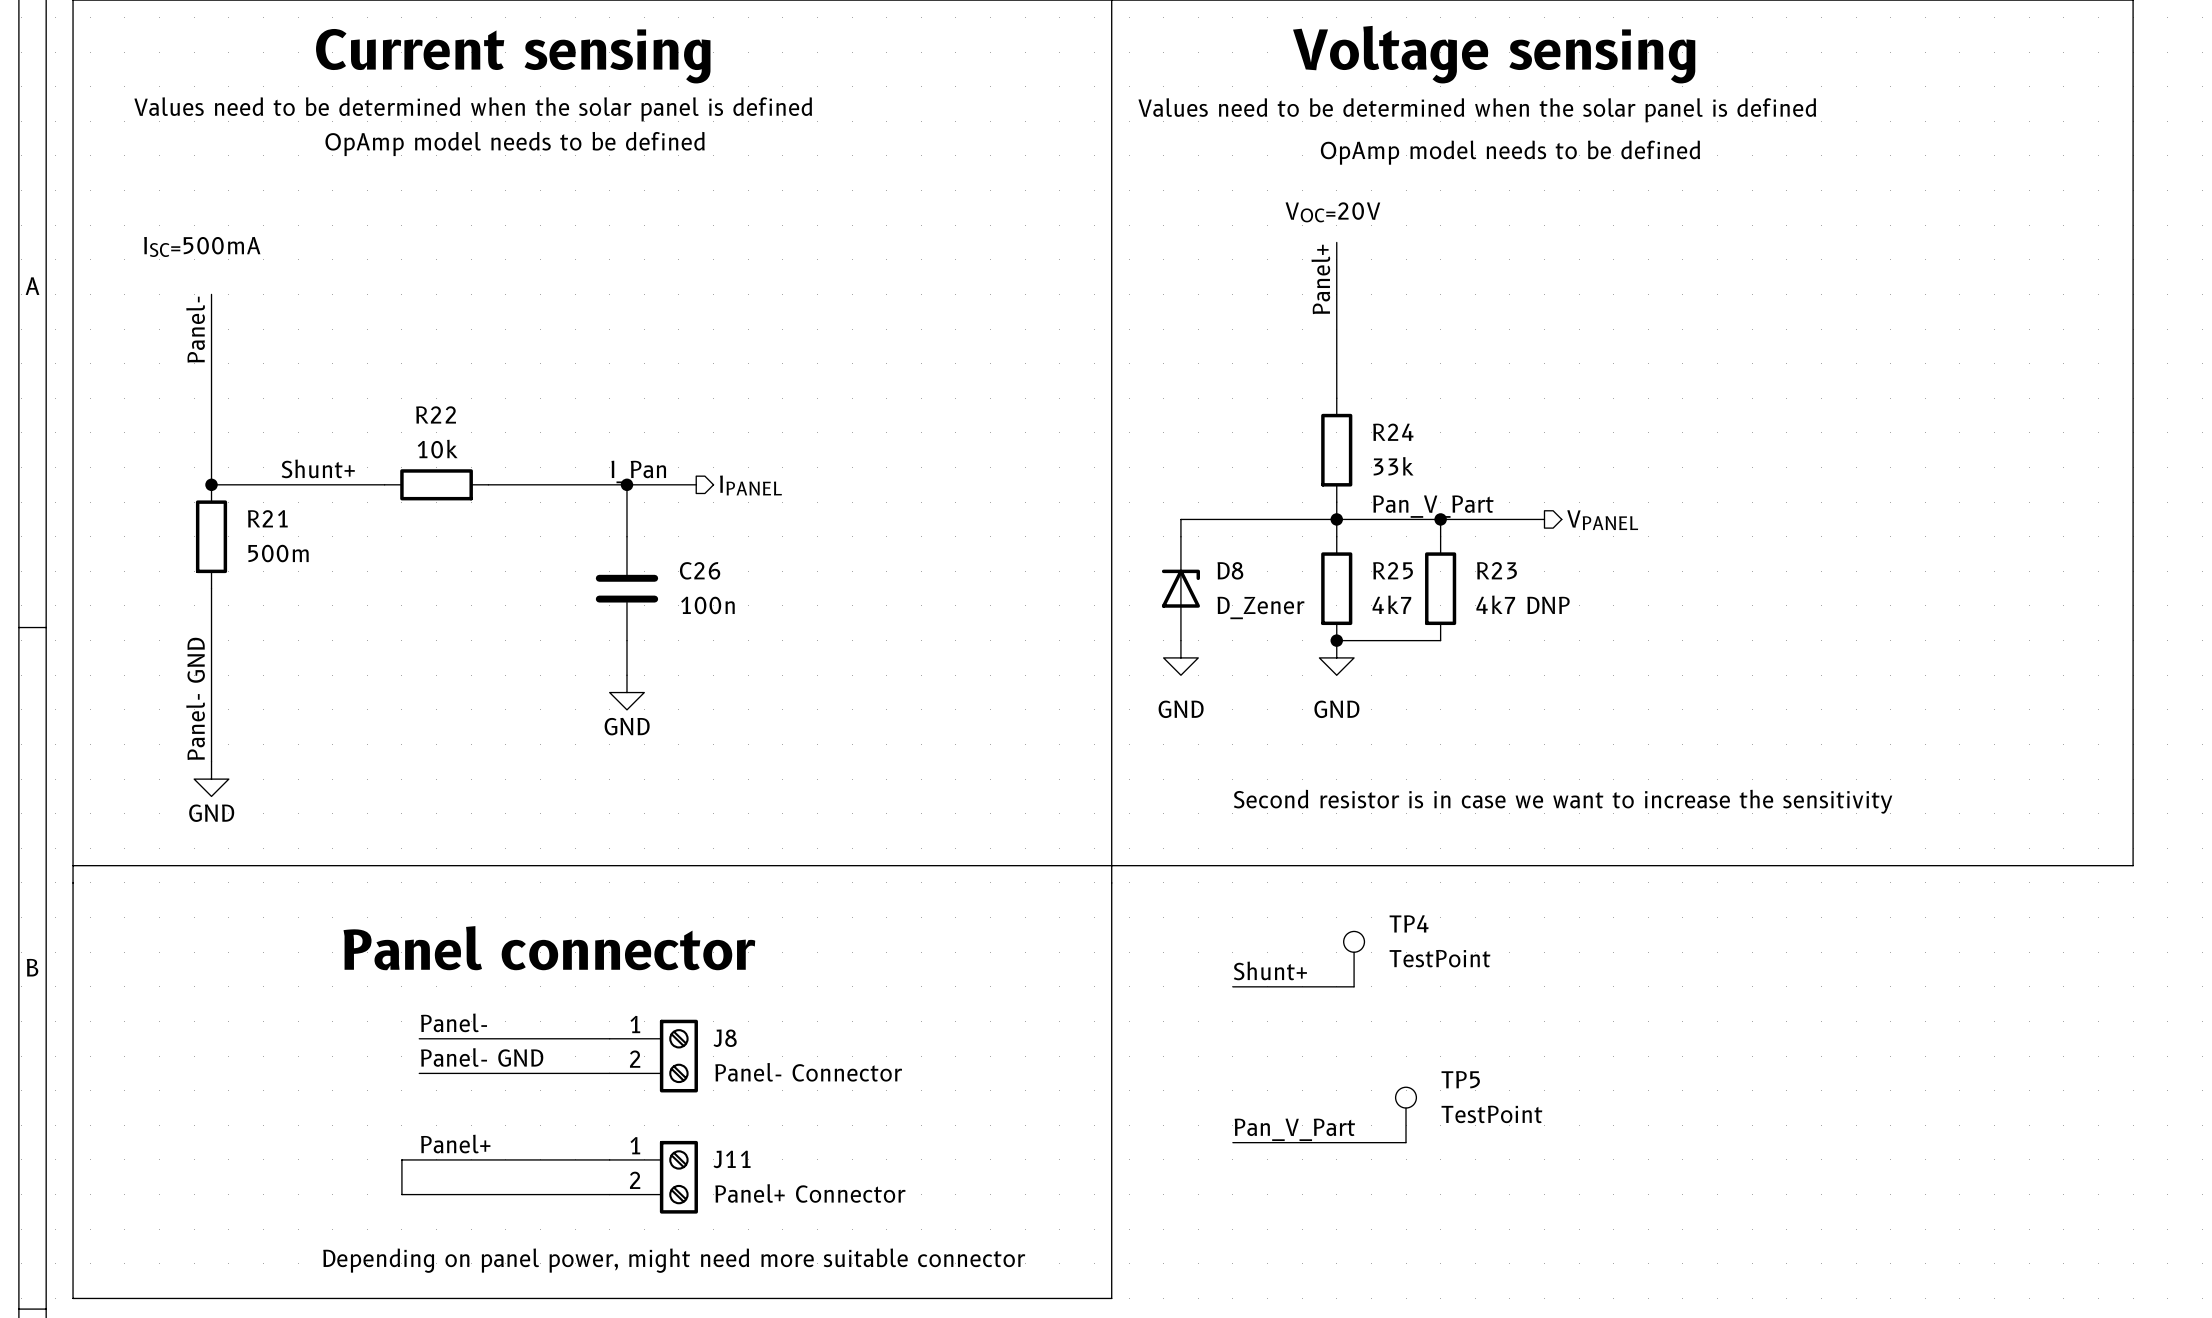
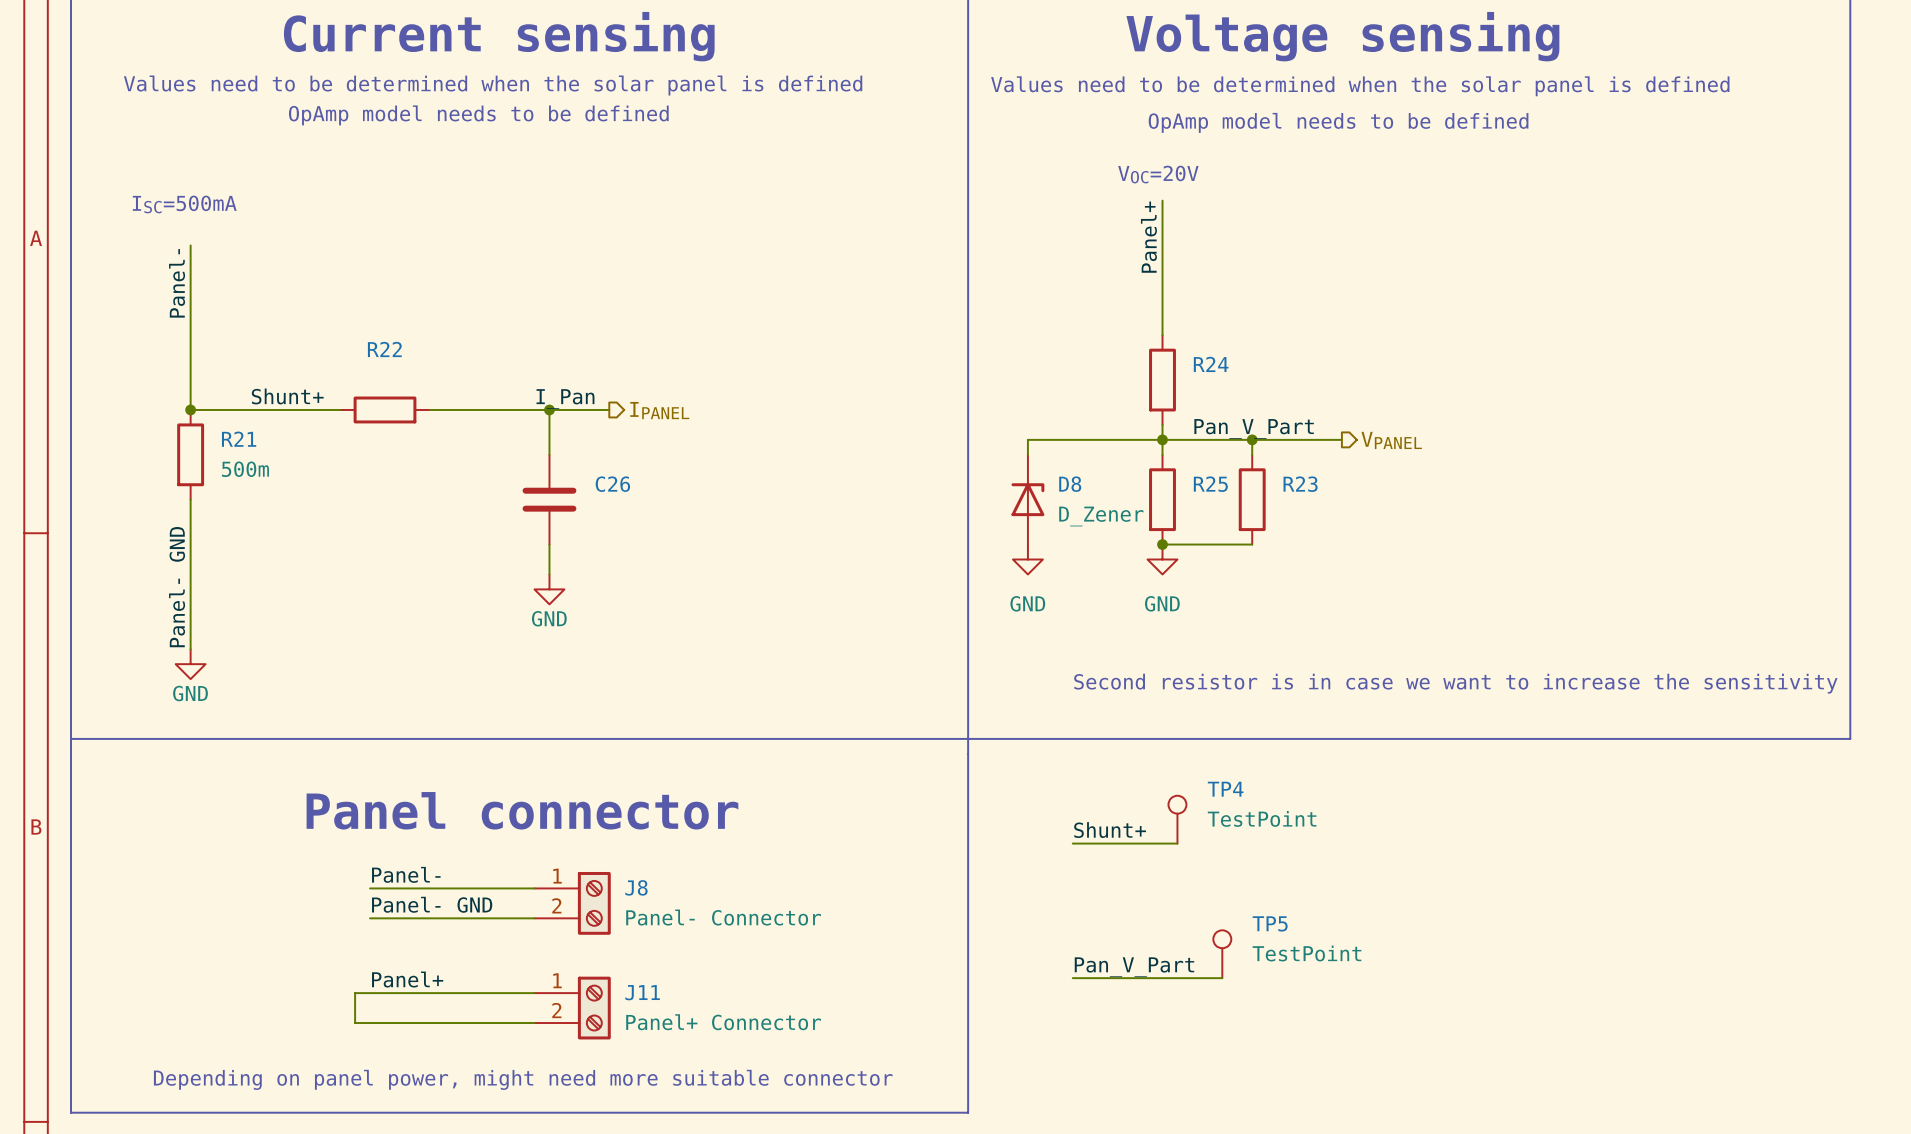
R22 value: 10k (437, 449) -> none
R24 value: 33k (1393, 466) -> none
R25 value: 4k7 (1391, 604) -> none
R23 value: 4k7 DNP (1523, 604) -> none
C26 value: 100n (707, 605) -> none

